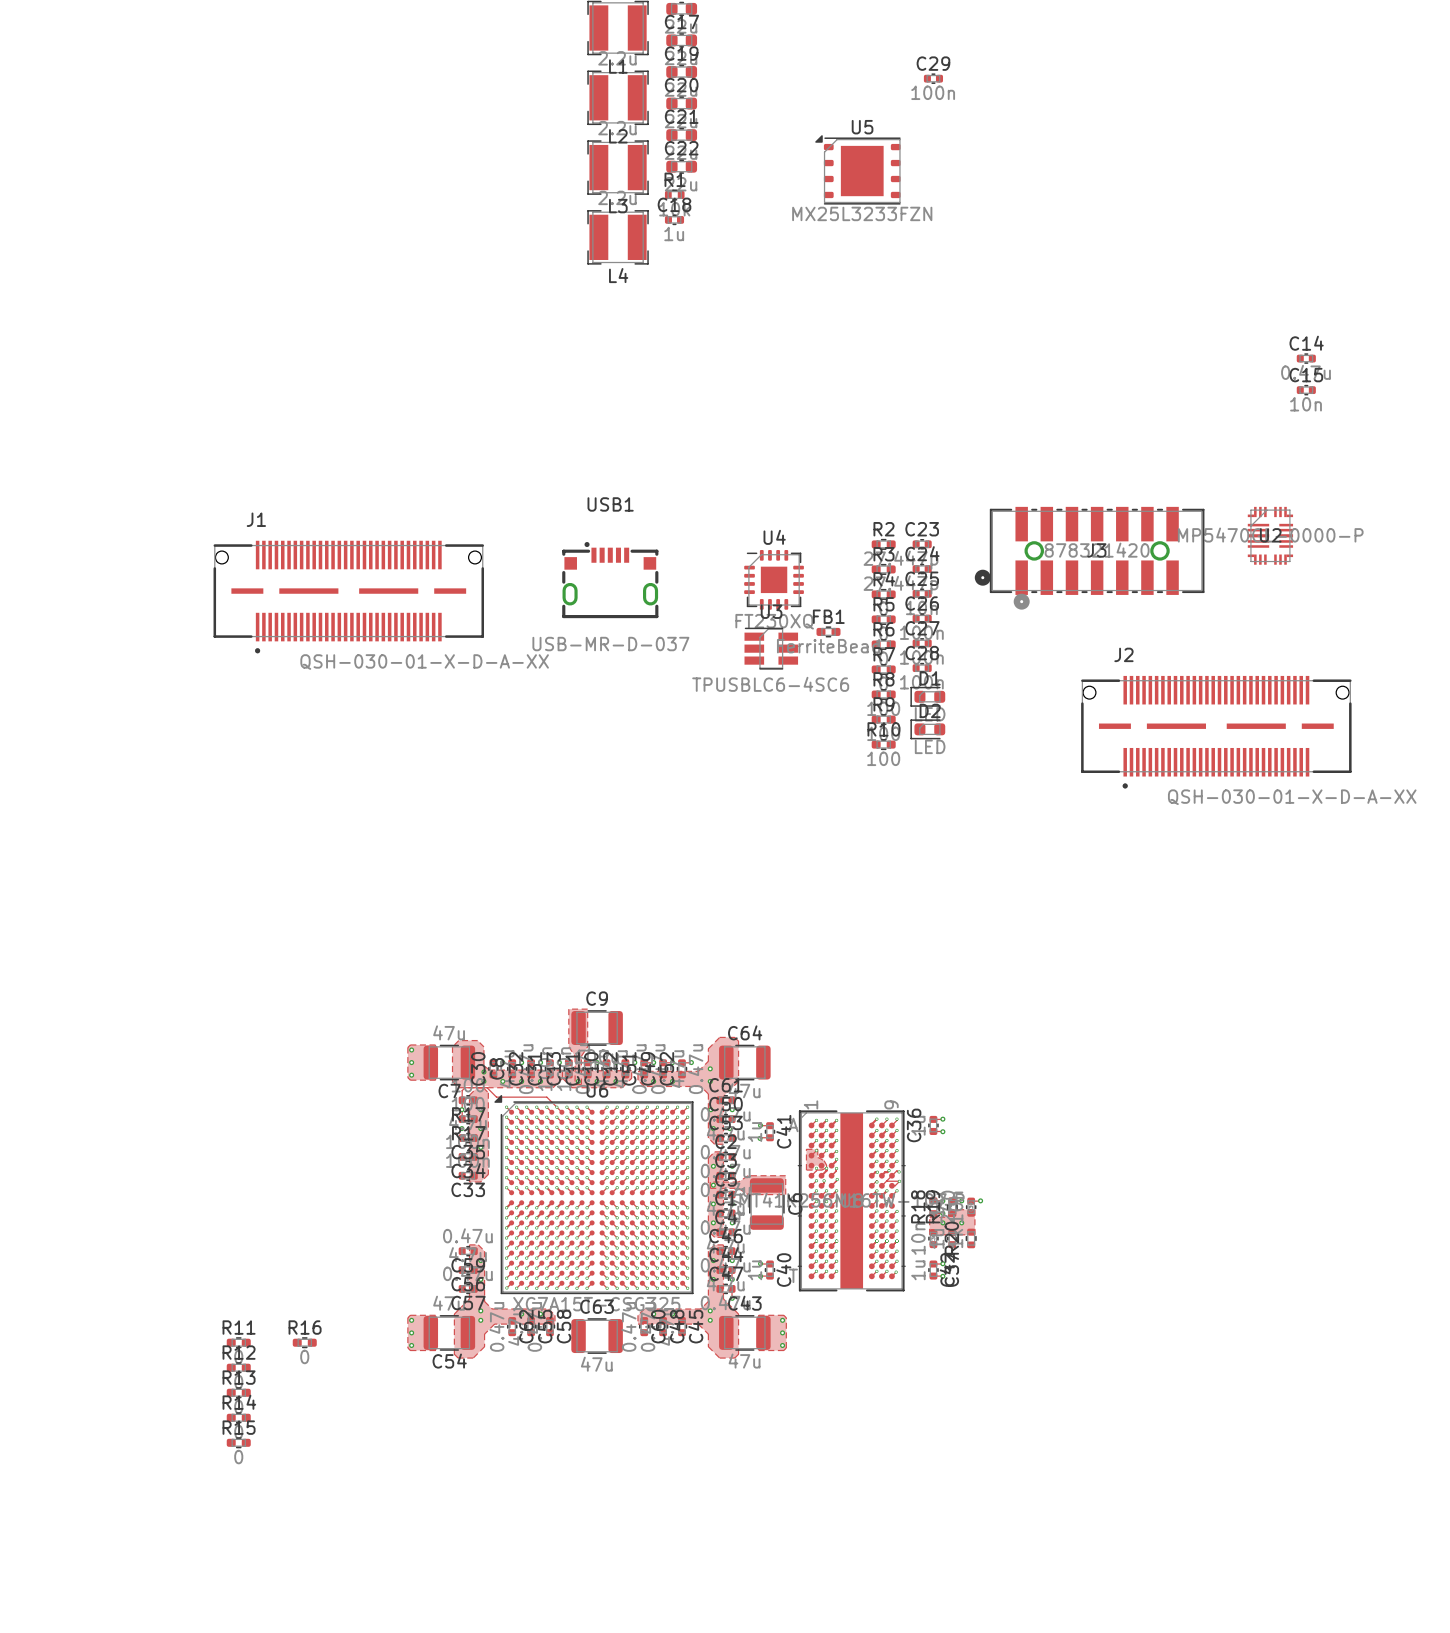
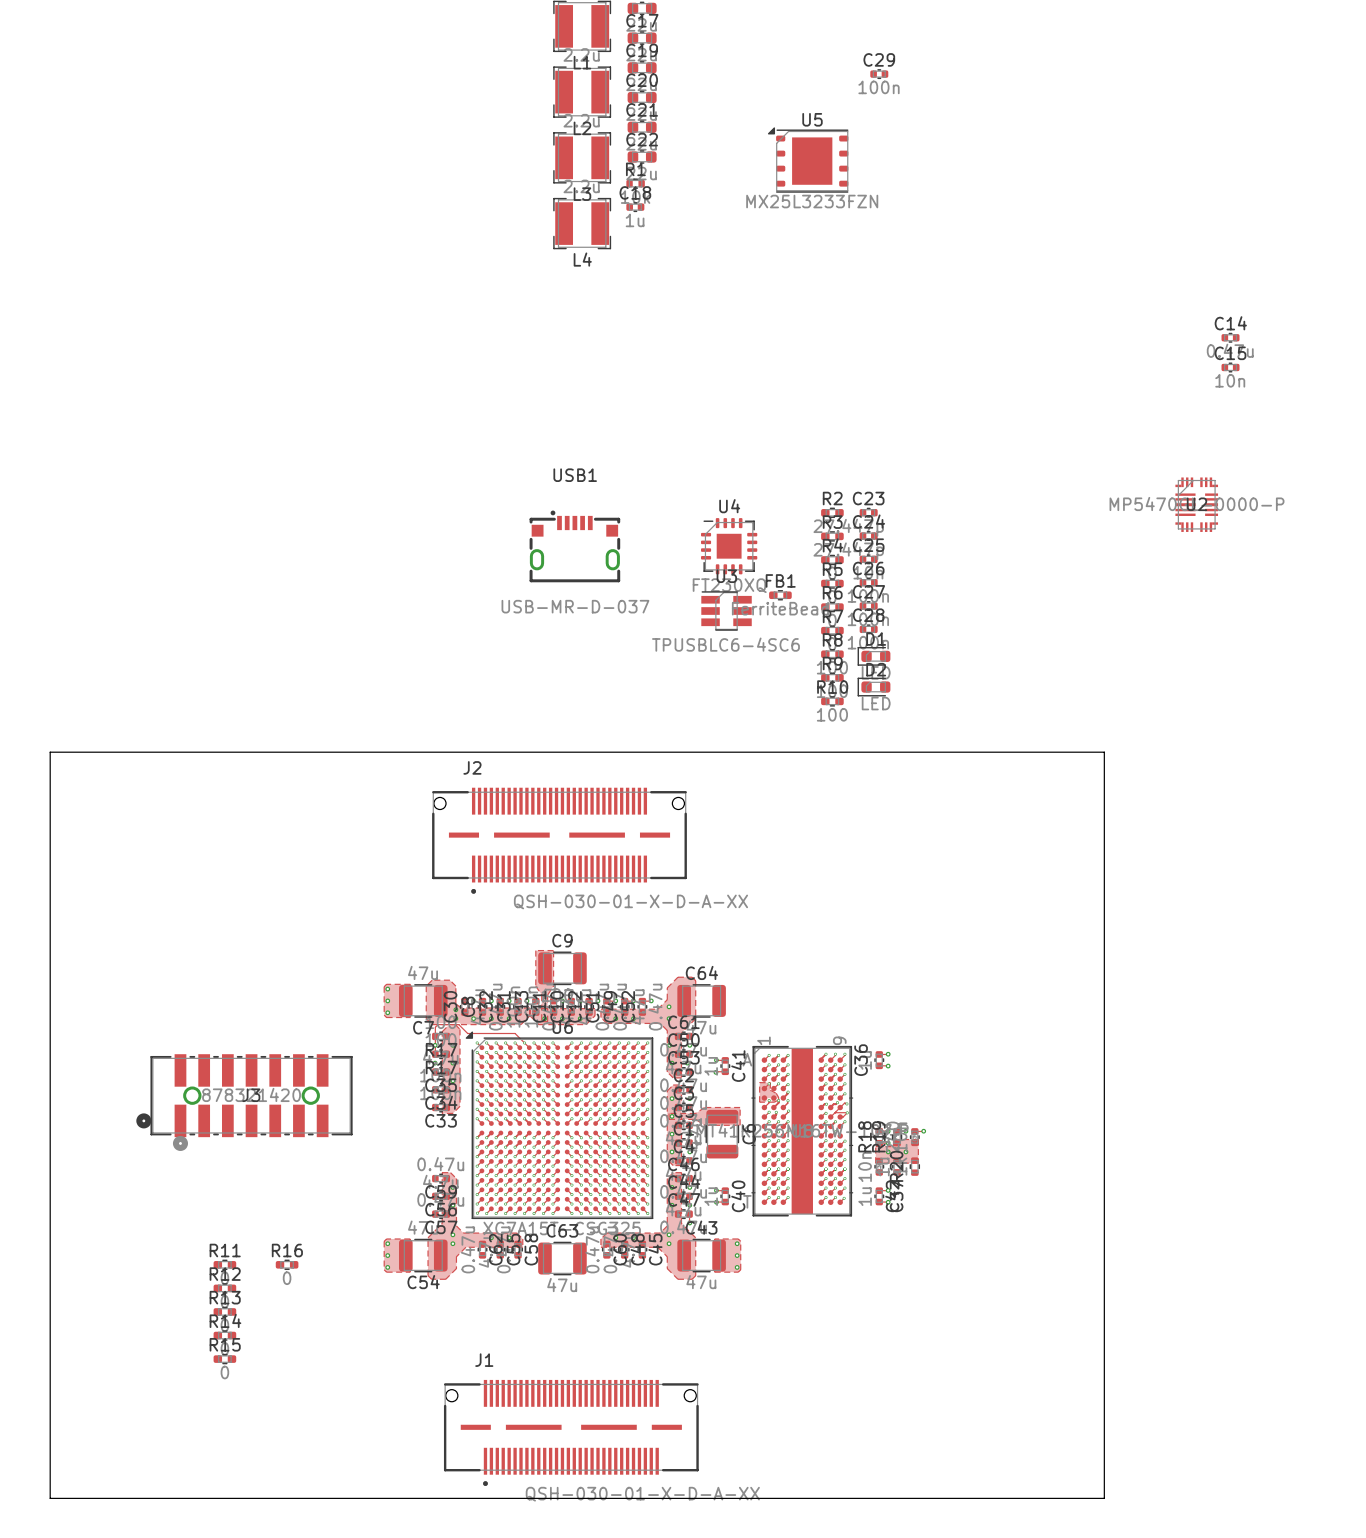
J3 position: (1089, 558) -> (244, 1102)
J1 position: (348, 597) -> (571, 1432)
J2 position: (1216, 732) -> (559, 840)
board edge: none -> (50, 752) (1104, 752) (1104, 1498) (50, 1498) (50, 752)

